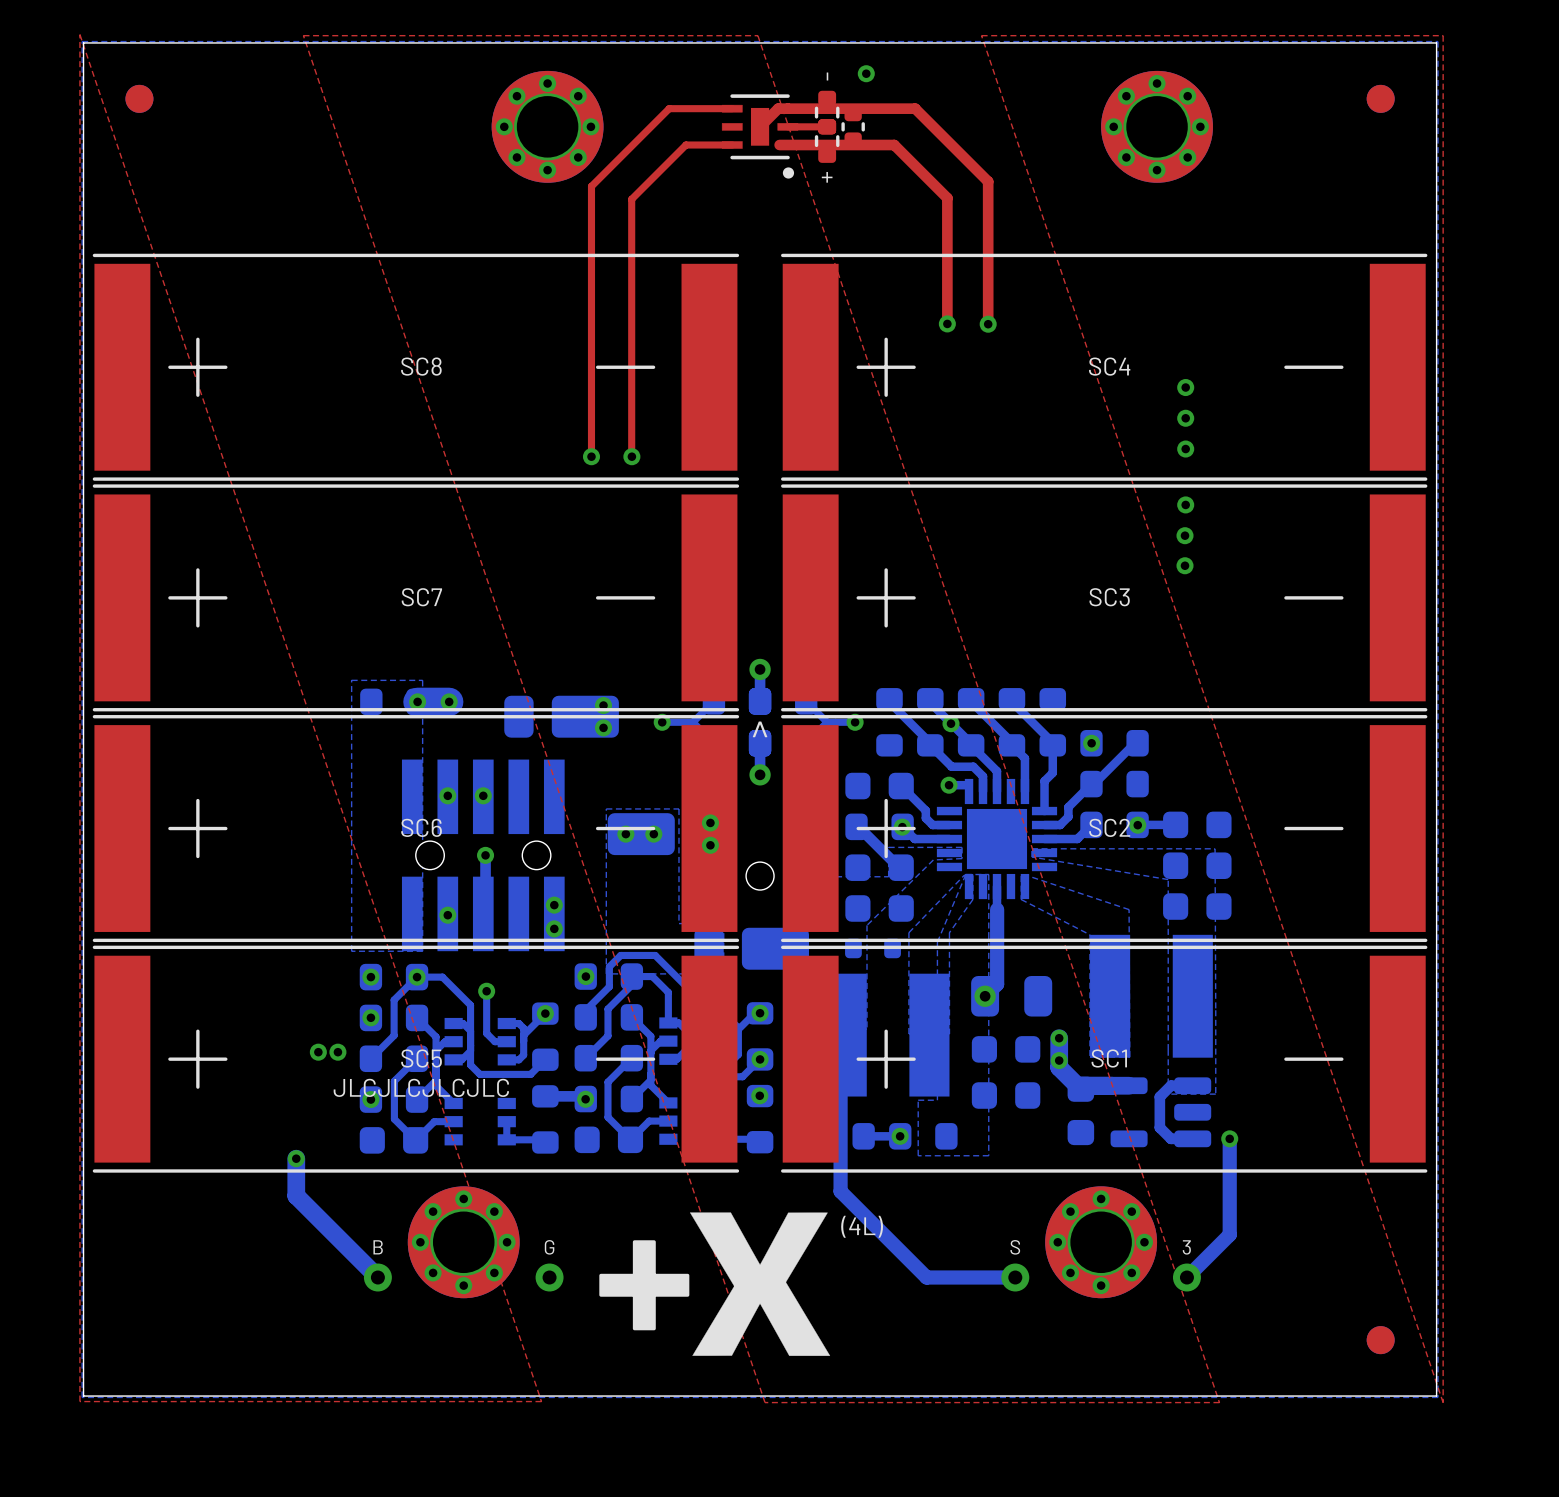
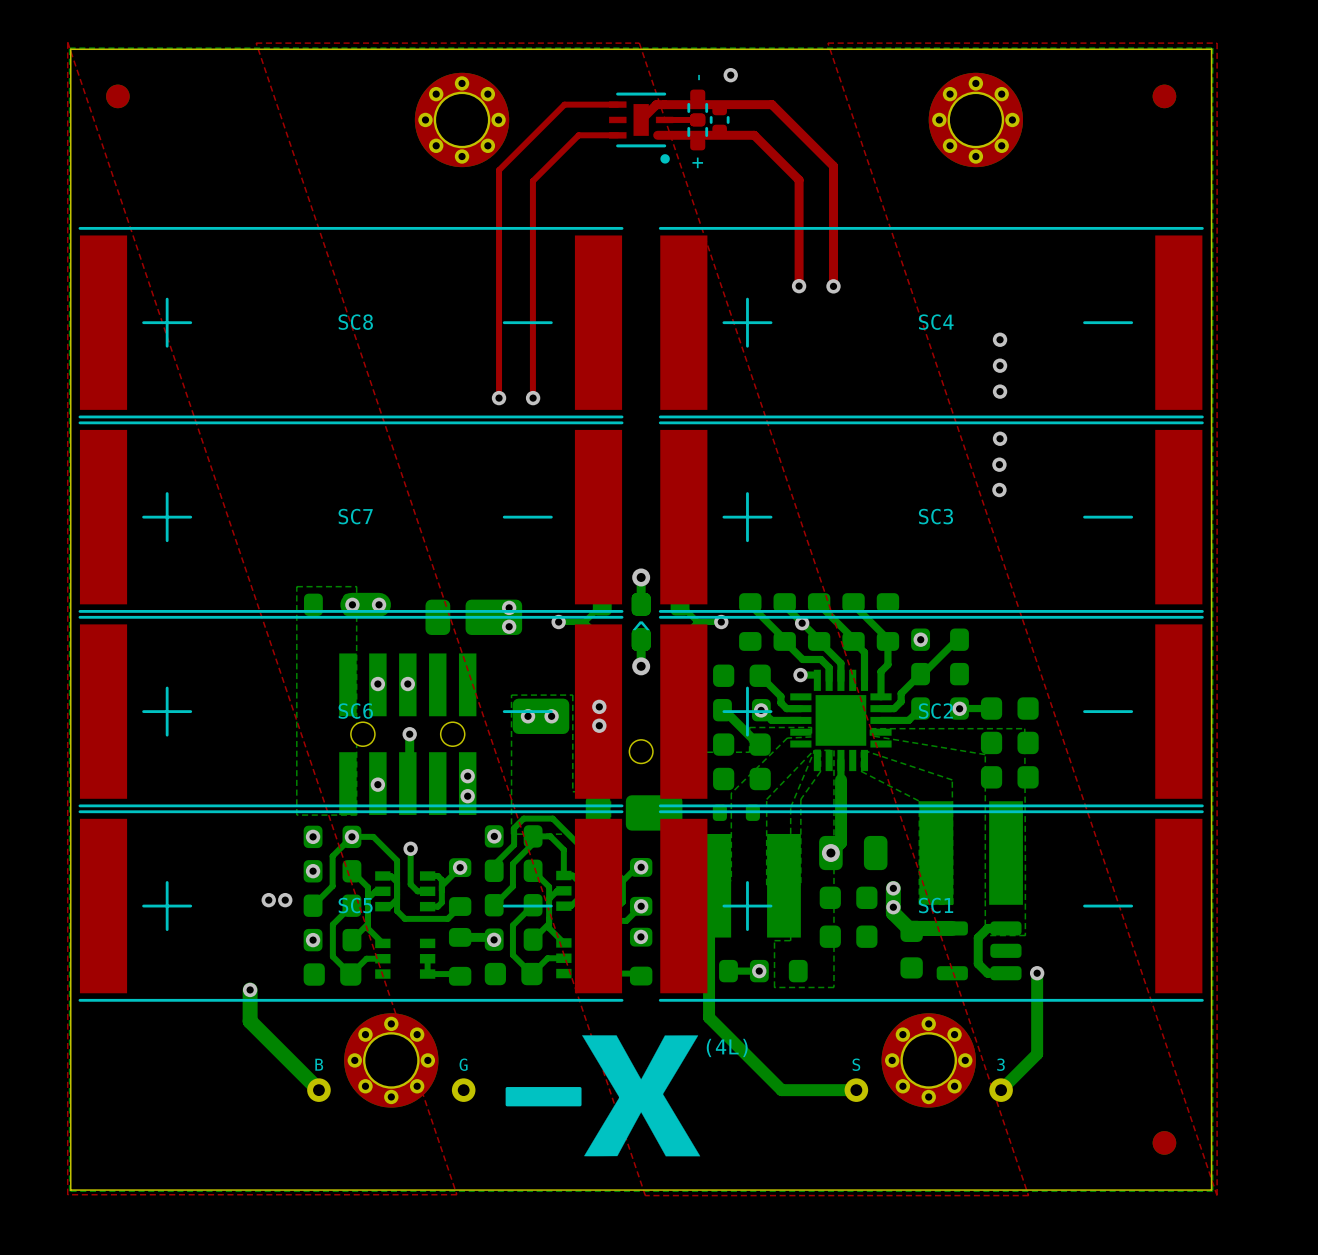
text: JLCJLCJLCJLC (421, 1087) -> none
drawing shape: [599, 1212, 831, 1356] -> [505, 1035, 701, 1157]

